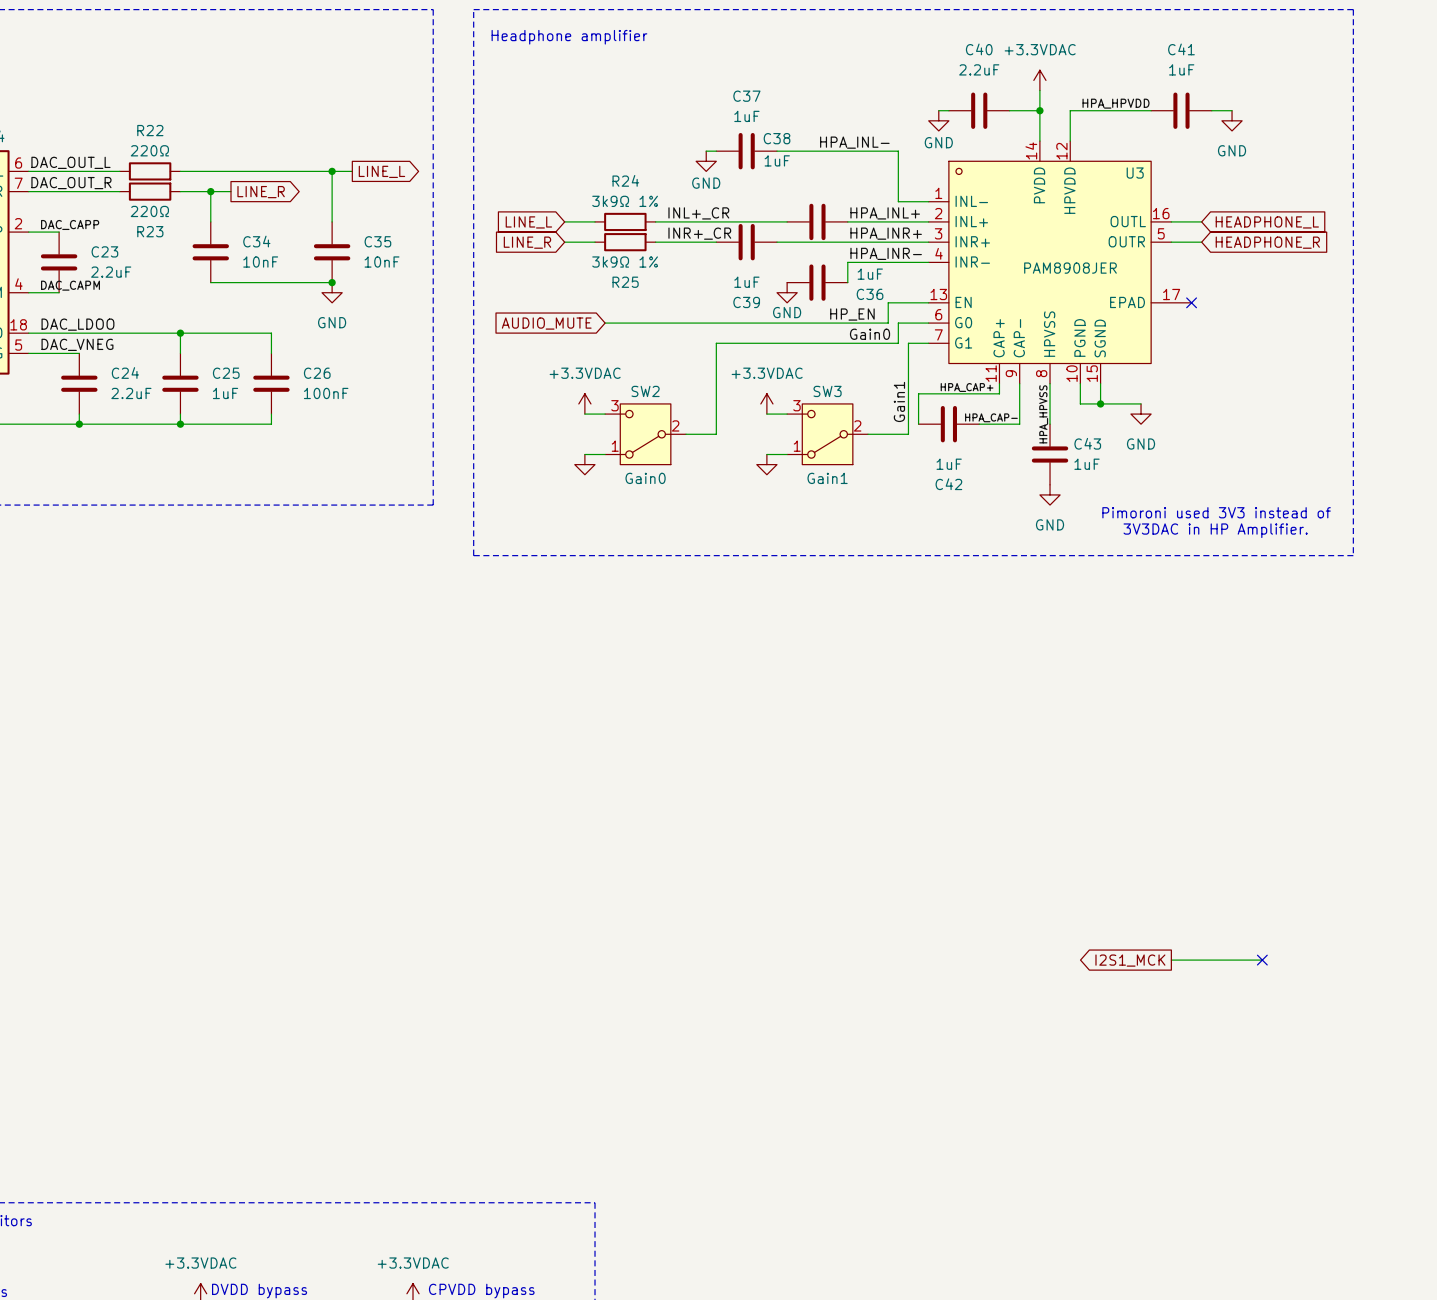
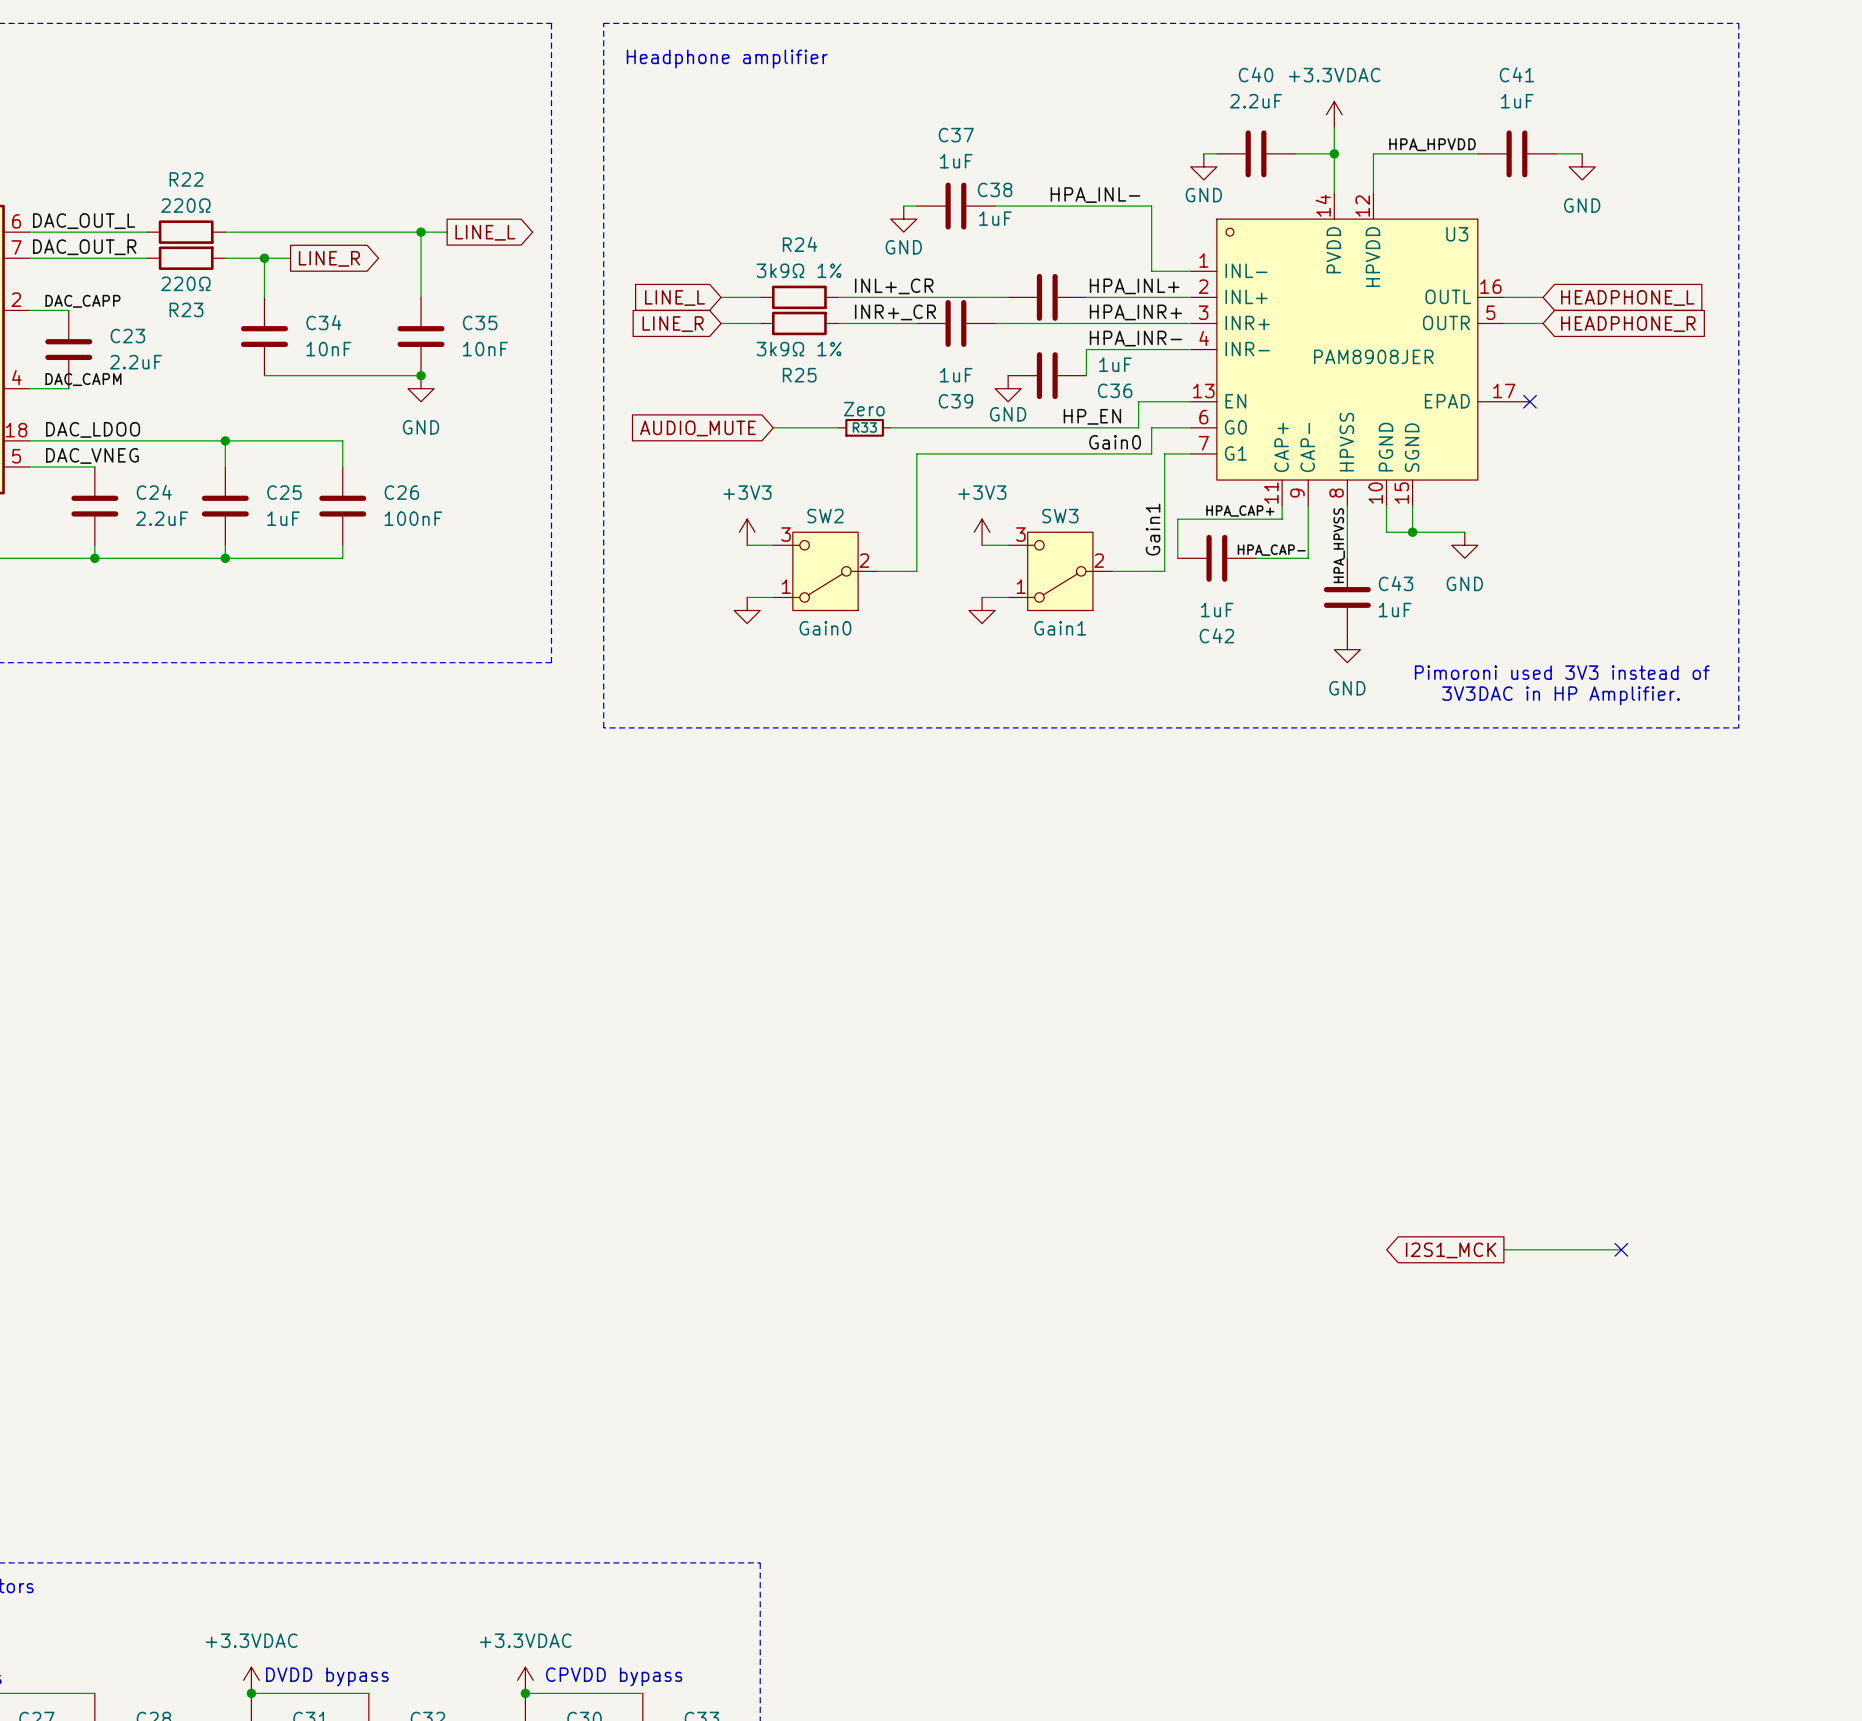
R33: none -> Zero (864, 427)
power symbol: +3.3VDAC (584, 403) -> +3V3 (747, 532)
power symbol: +3.3VDAC (766, 403) -> +3V3 (982, 532)

